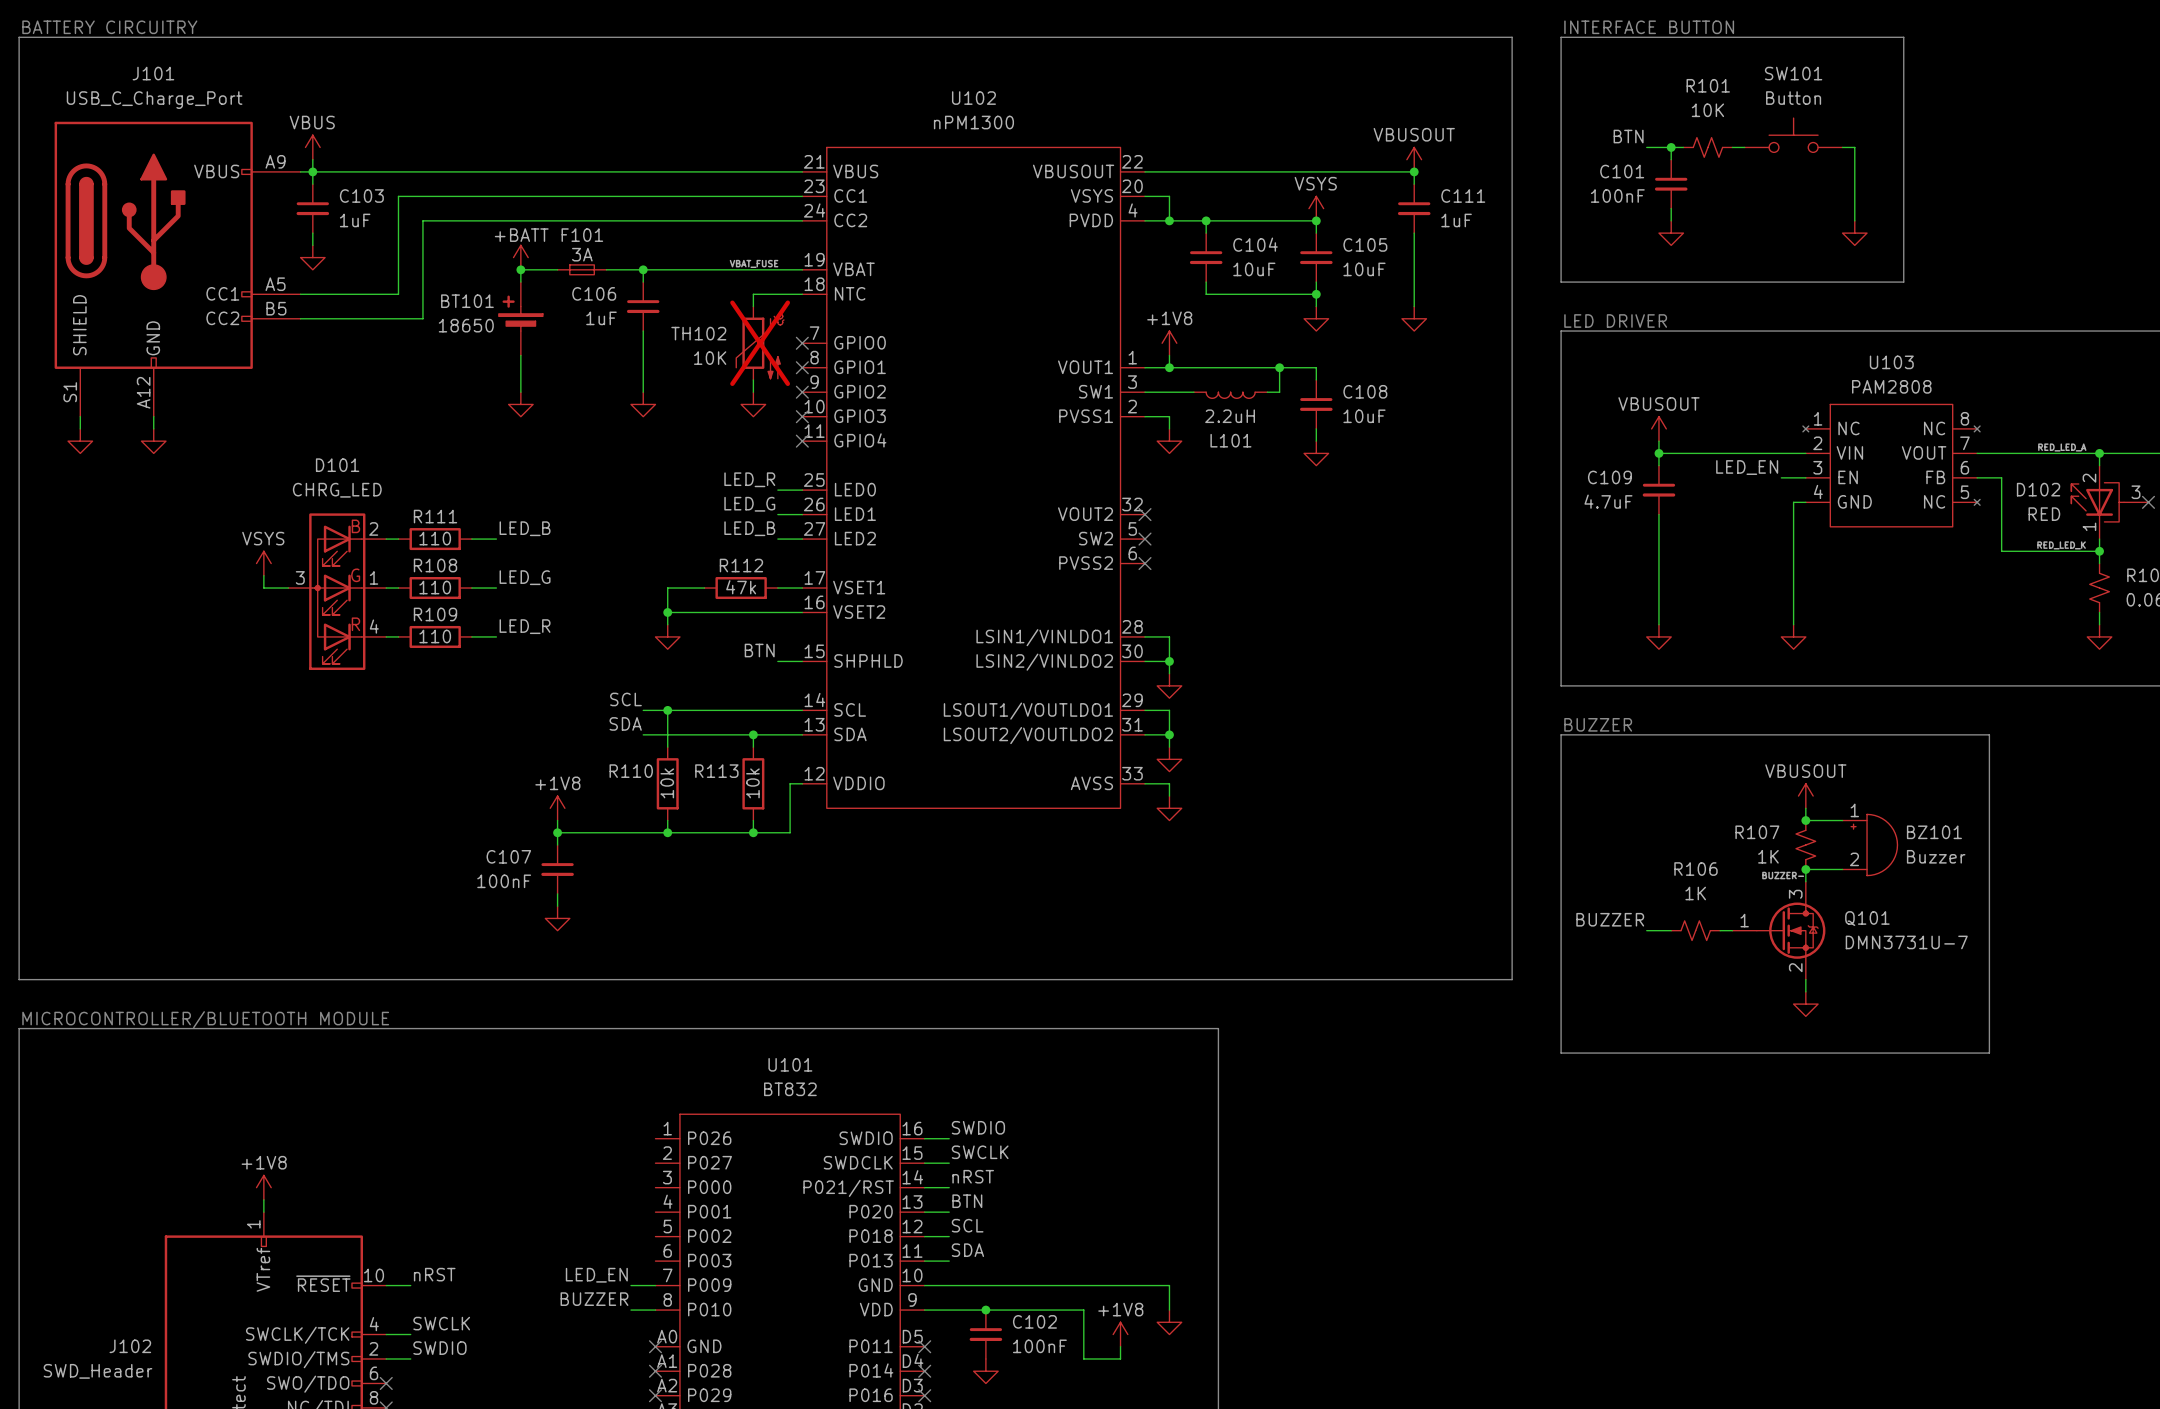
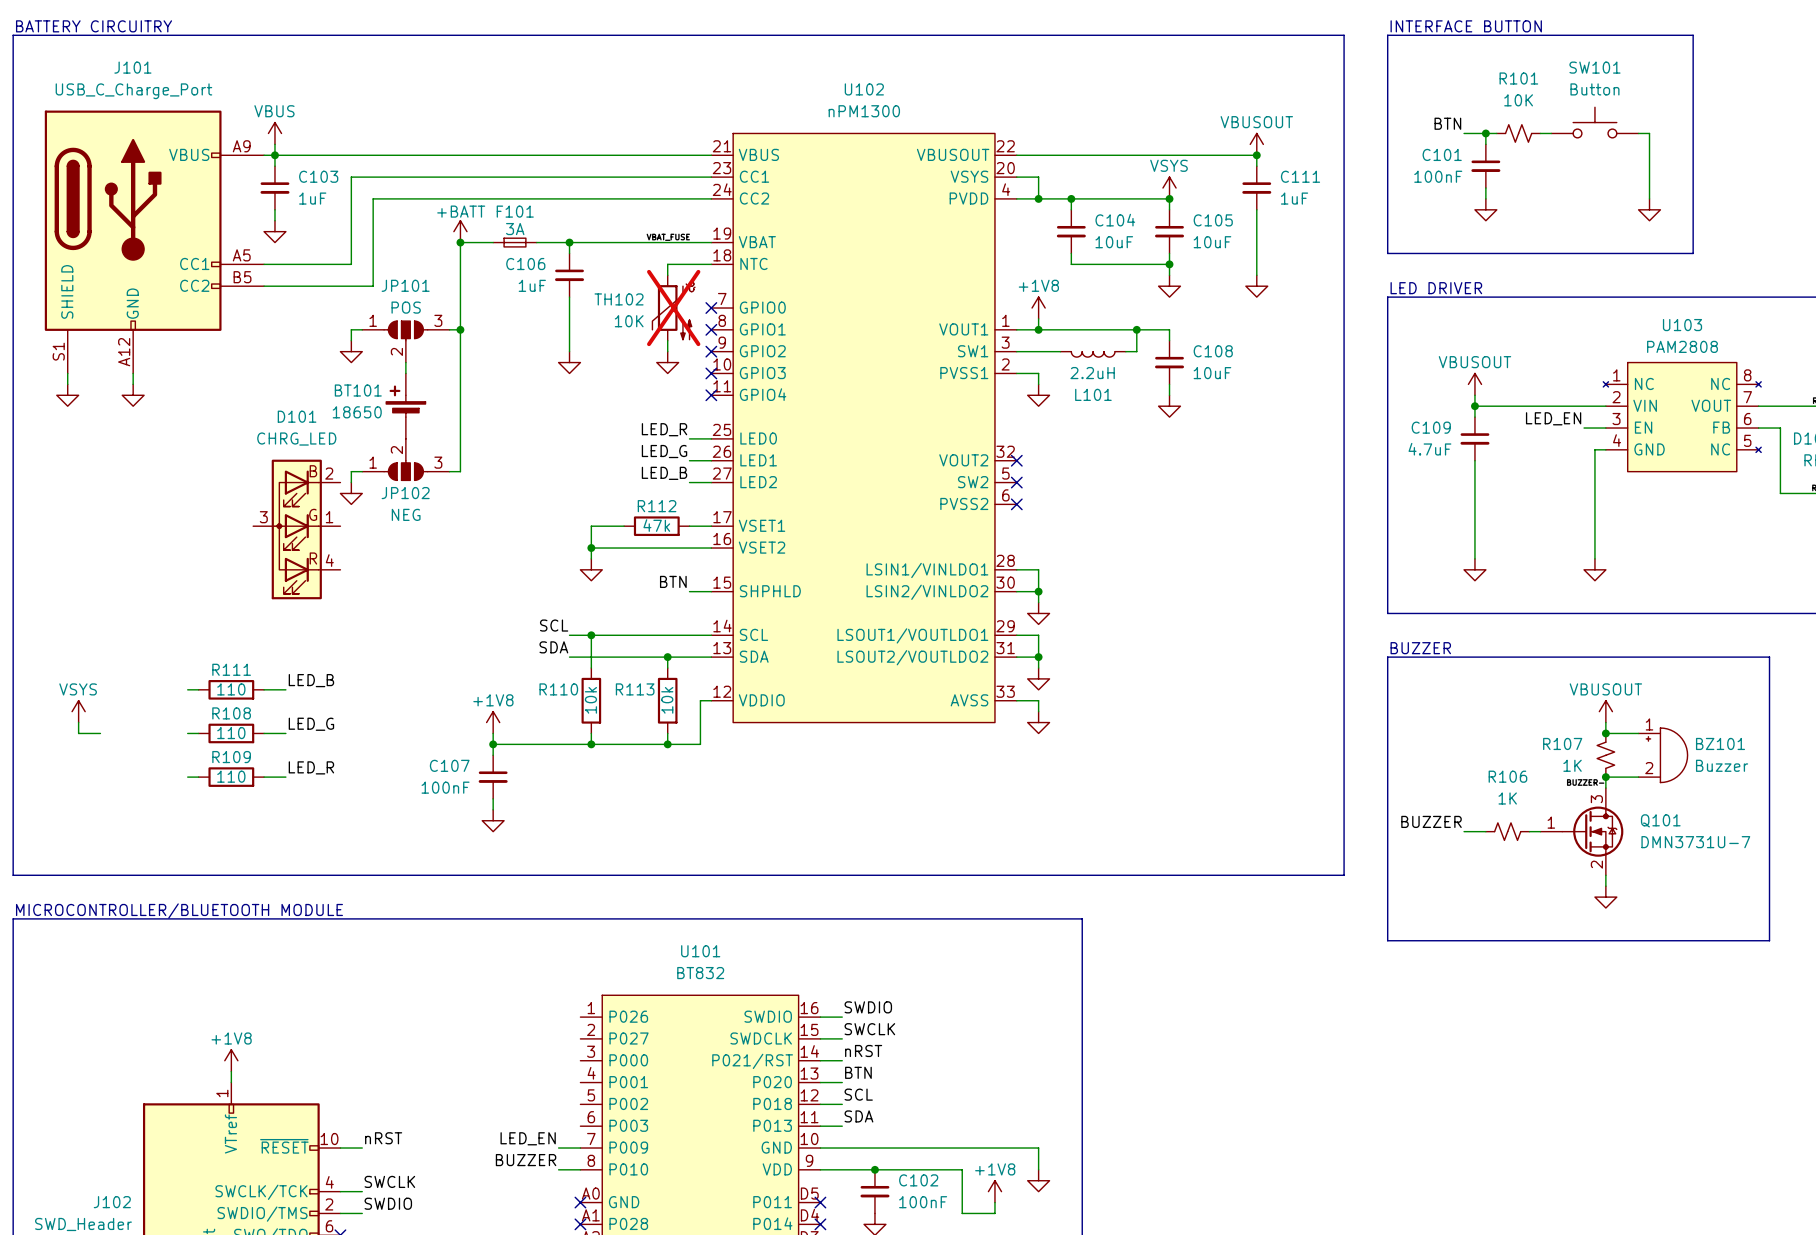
BT101 position: (520, 318) -> (405, 406)
wire: none -> (362, 329) (351, 329) (351, 340)
wire: none -> (449, 329) (460, 329)
junction: none -> (460, 329)
JP101: none -> POS (405, 341)
power symbol: none -> (351, 351)
wire: none -> (460, 351) (460, 471) (449, 471)
wire: none -> (405, 362) (405, 373)
power symbol: (520, 404) -> none
JP102: none -> NEG (405, 459)
label: LED_B (525, 528) -> none
wire: (386, 539) (398, 539) -> (362, 471) (351, 471) (351, 482)
R111 position: (435, 539) -> (231, 689)
wire: (471, 539) (496, 539) -> none
power symbol: none -> (351, 493)
power symbol: VSYS (263, 563) -> none
wire: (263, 575) (263, 588) (288, 588) -> none
label: LED_G (525, 577) -> none
wire: (386, 588) (398, 588) -> none
R108 position: (435, 588) -> (231, 733)
wire: (471, 588) (496, 588) -> none
label: LED_R (525, 626) -> none
wire: (386, 636) (398, 636) -> (187, 689) (198, 689)
R109 position: (435, 636) -> (231, 777)
wire: (471, 636) (496, 636) -> (264, 689) (285, 689)
label: none -> LED_B (311, 680)
power symbol: none -> VSYS (78, 711)
wire: none -> (78, 722) (78, 733) (100, 733)
label: none -> LED_G (311, 724)
wire: none -> (187, 733) (198, 733)
wire: none -> (264, 733) (285, 733)
label: none -> LED_R (311, 767)
wire: none -> (187, 777) (198, 777)
wire: none -> (264, 777) (285, 777)

